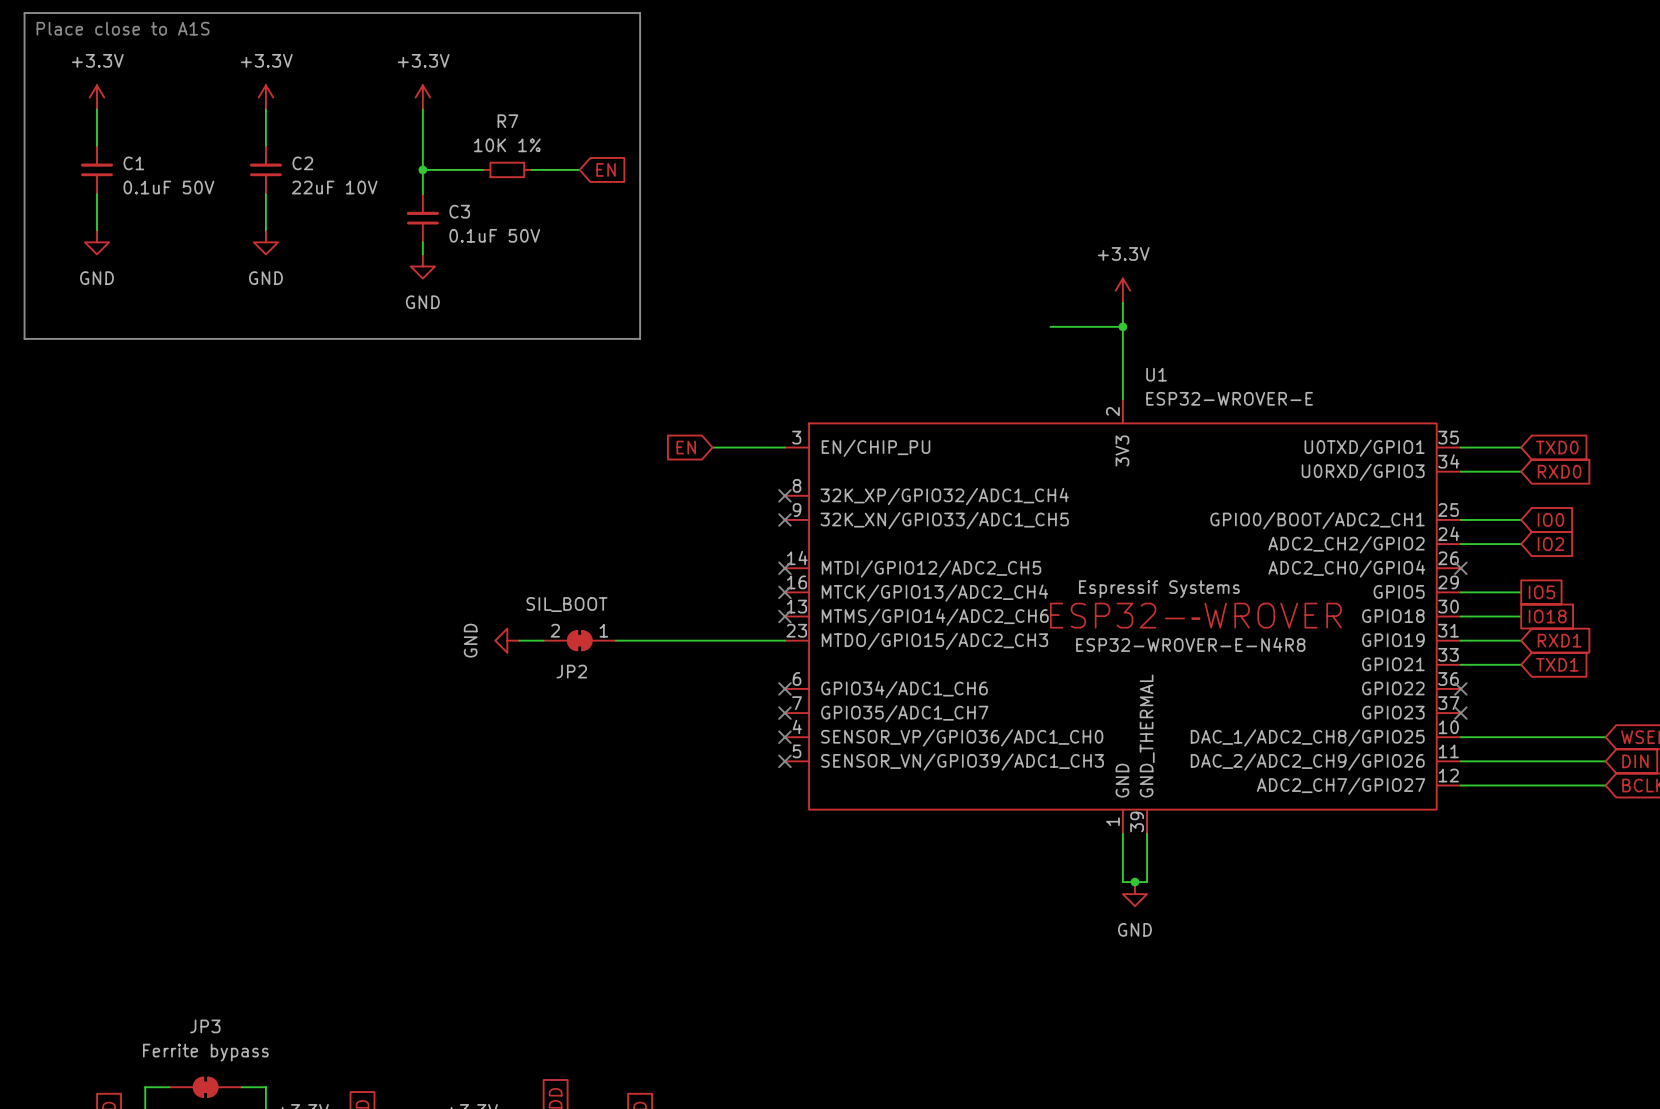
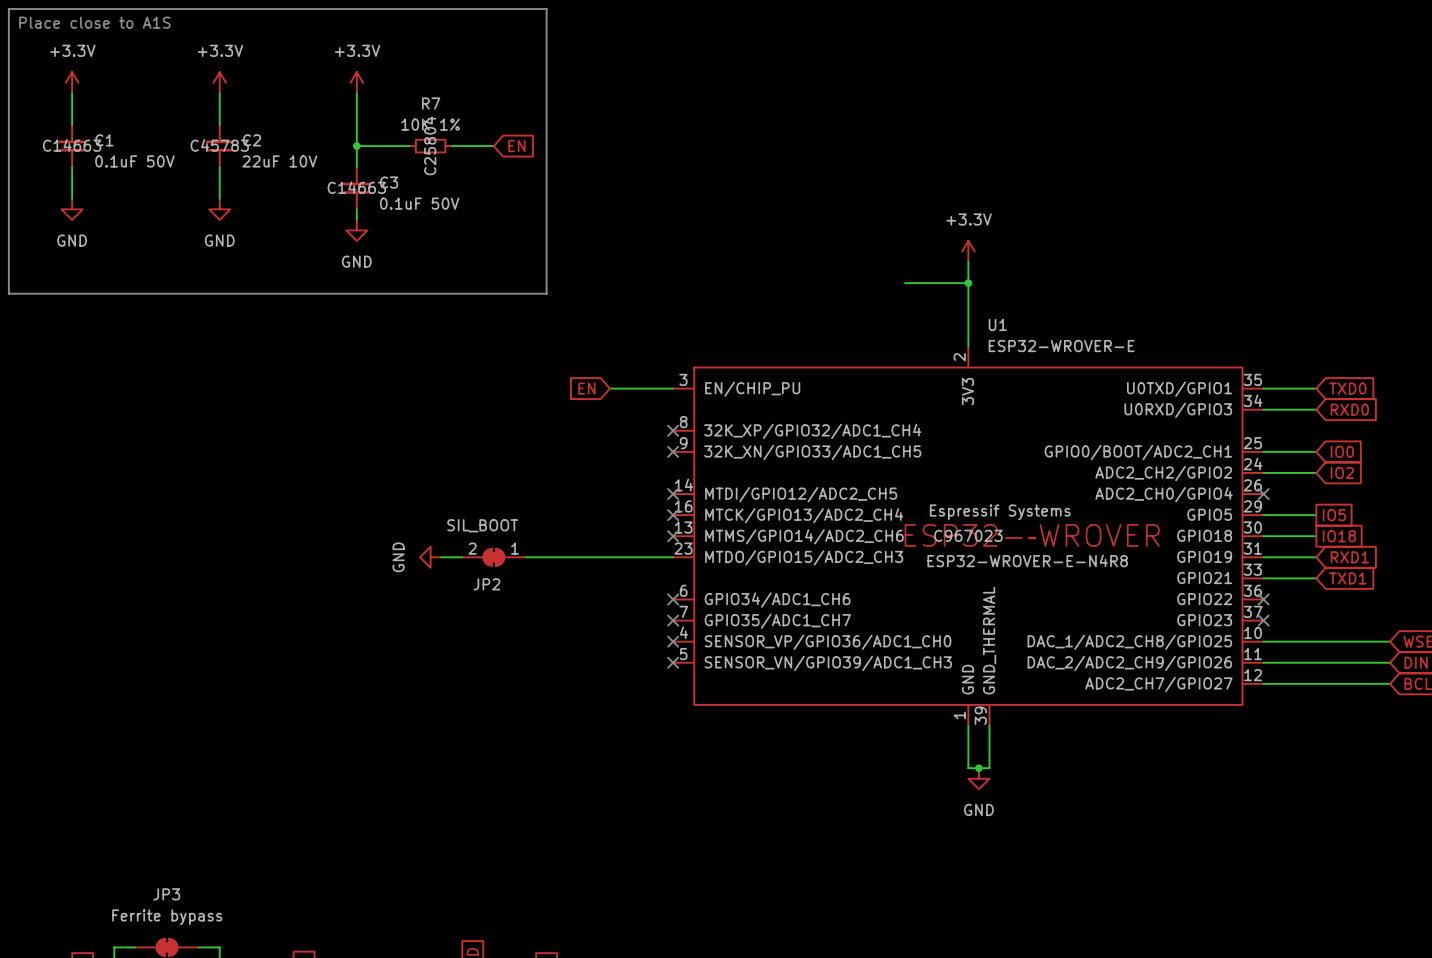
C1 text: none -> C14663 (72, 145)
C2 text: none -> C45783 (219, 145)
R7 text: none -> C25804 (429, 145)
C3 text: none -> C14663 (356, 187)
U1 text: none -> C967023 (968, 535)

